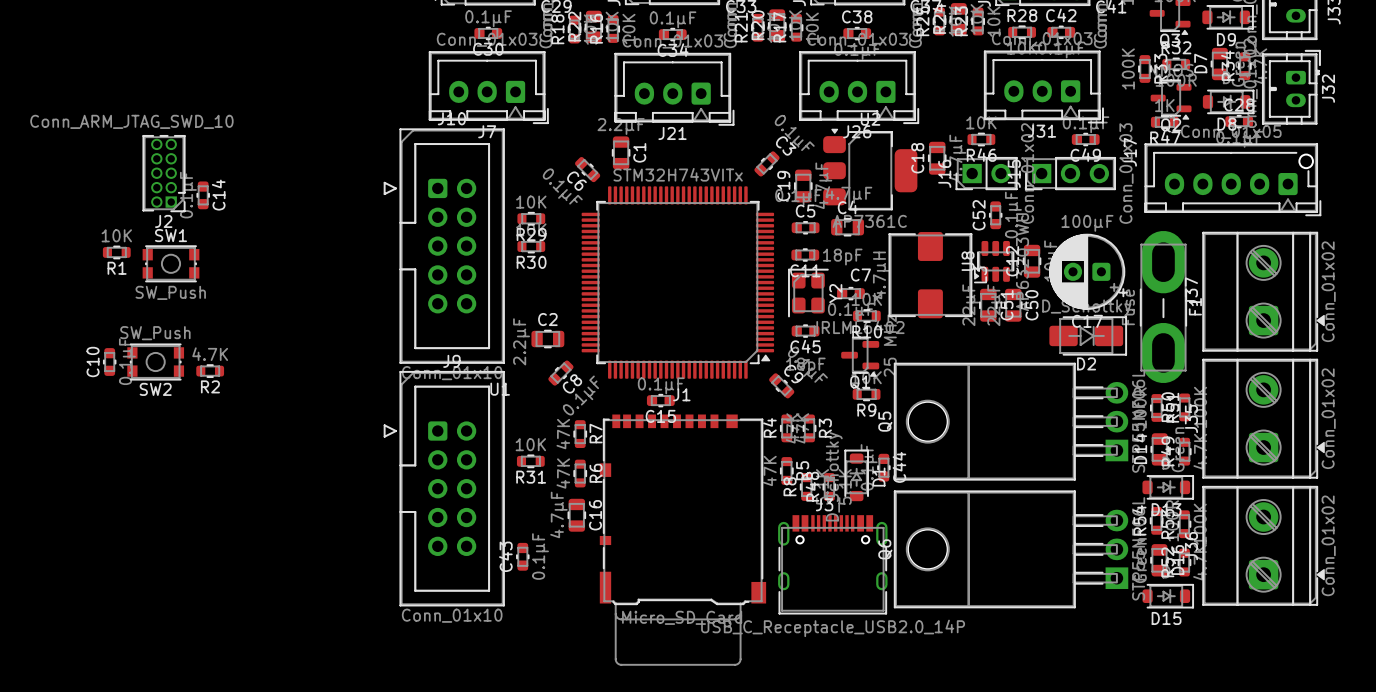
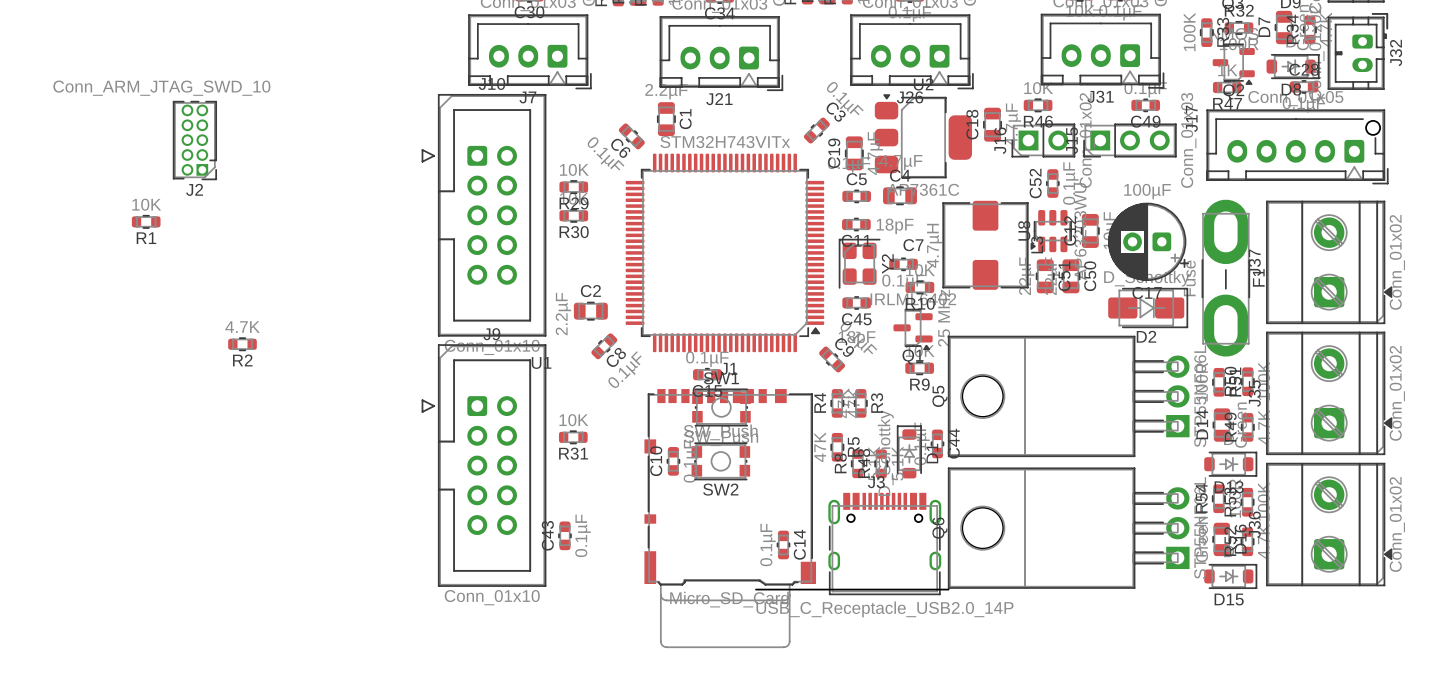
C14 position: (203, 195) -> (783, 544)
SW1 position: (171, 263) -> (721, 407)
C10 position: (109, 362) -> (673, 461)
SW2 position: (155, 362) -> (720, 461)
R7: 47K (580, 434) -> none
R6: 47K (580, 473) -> none
C16: 4.7µF (576, 515) -> none
board edge: none -> (755, 589) (948, 589)

